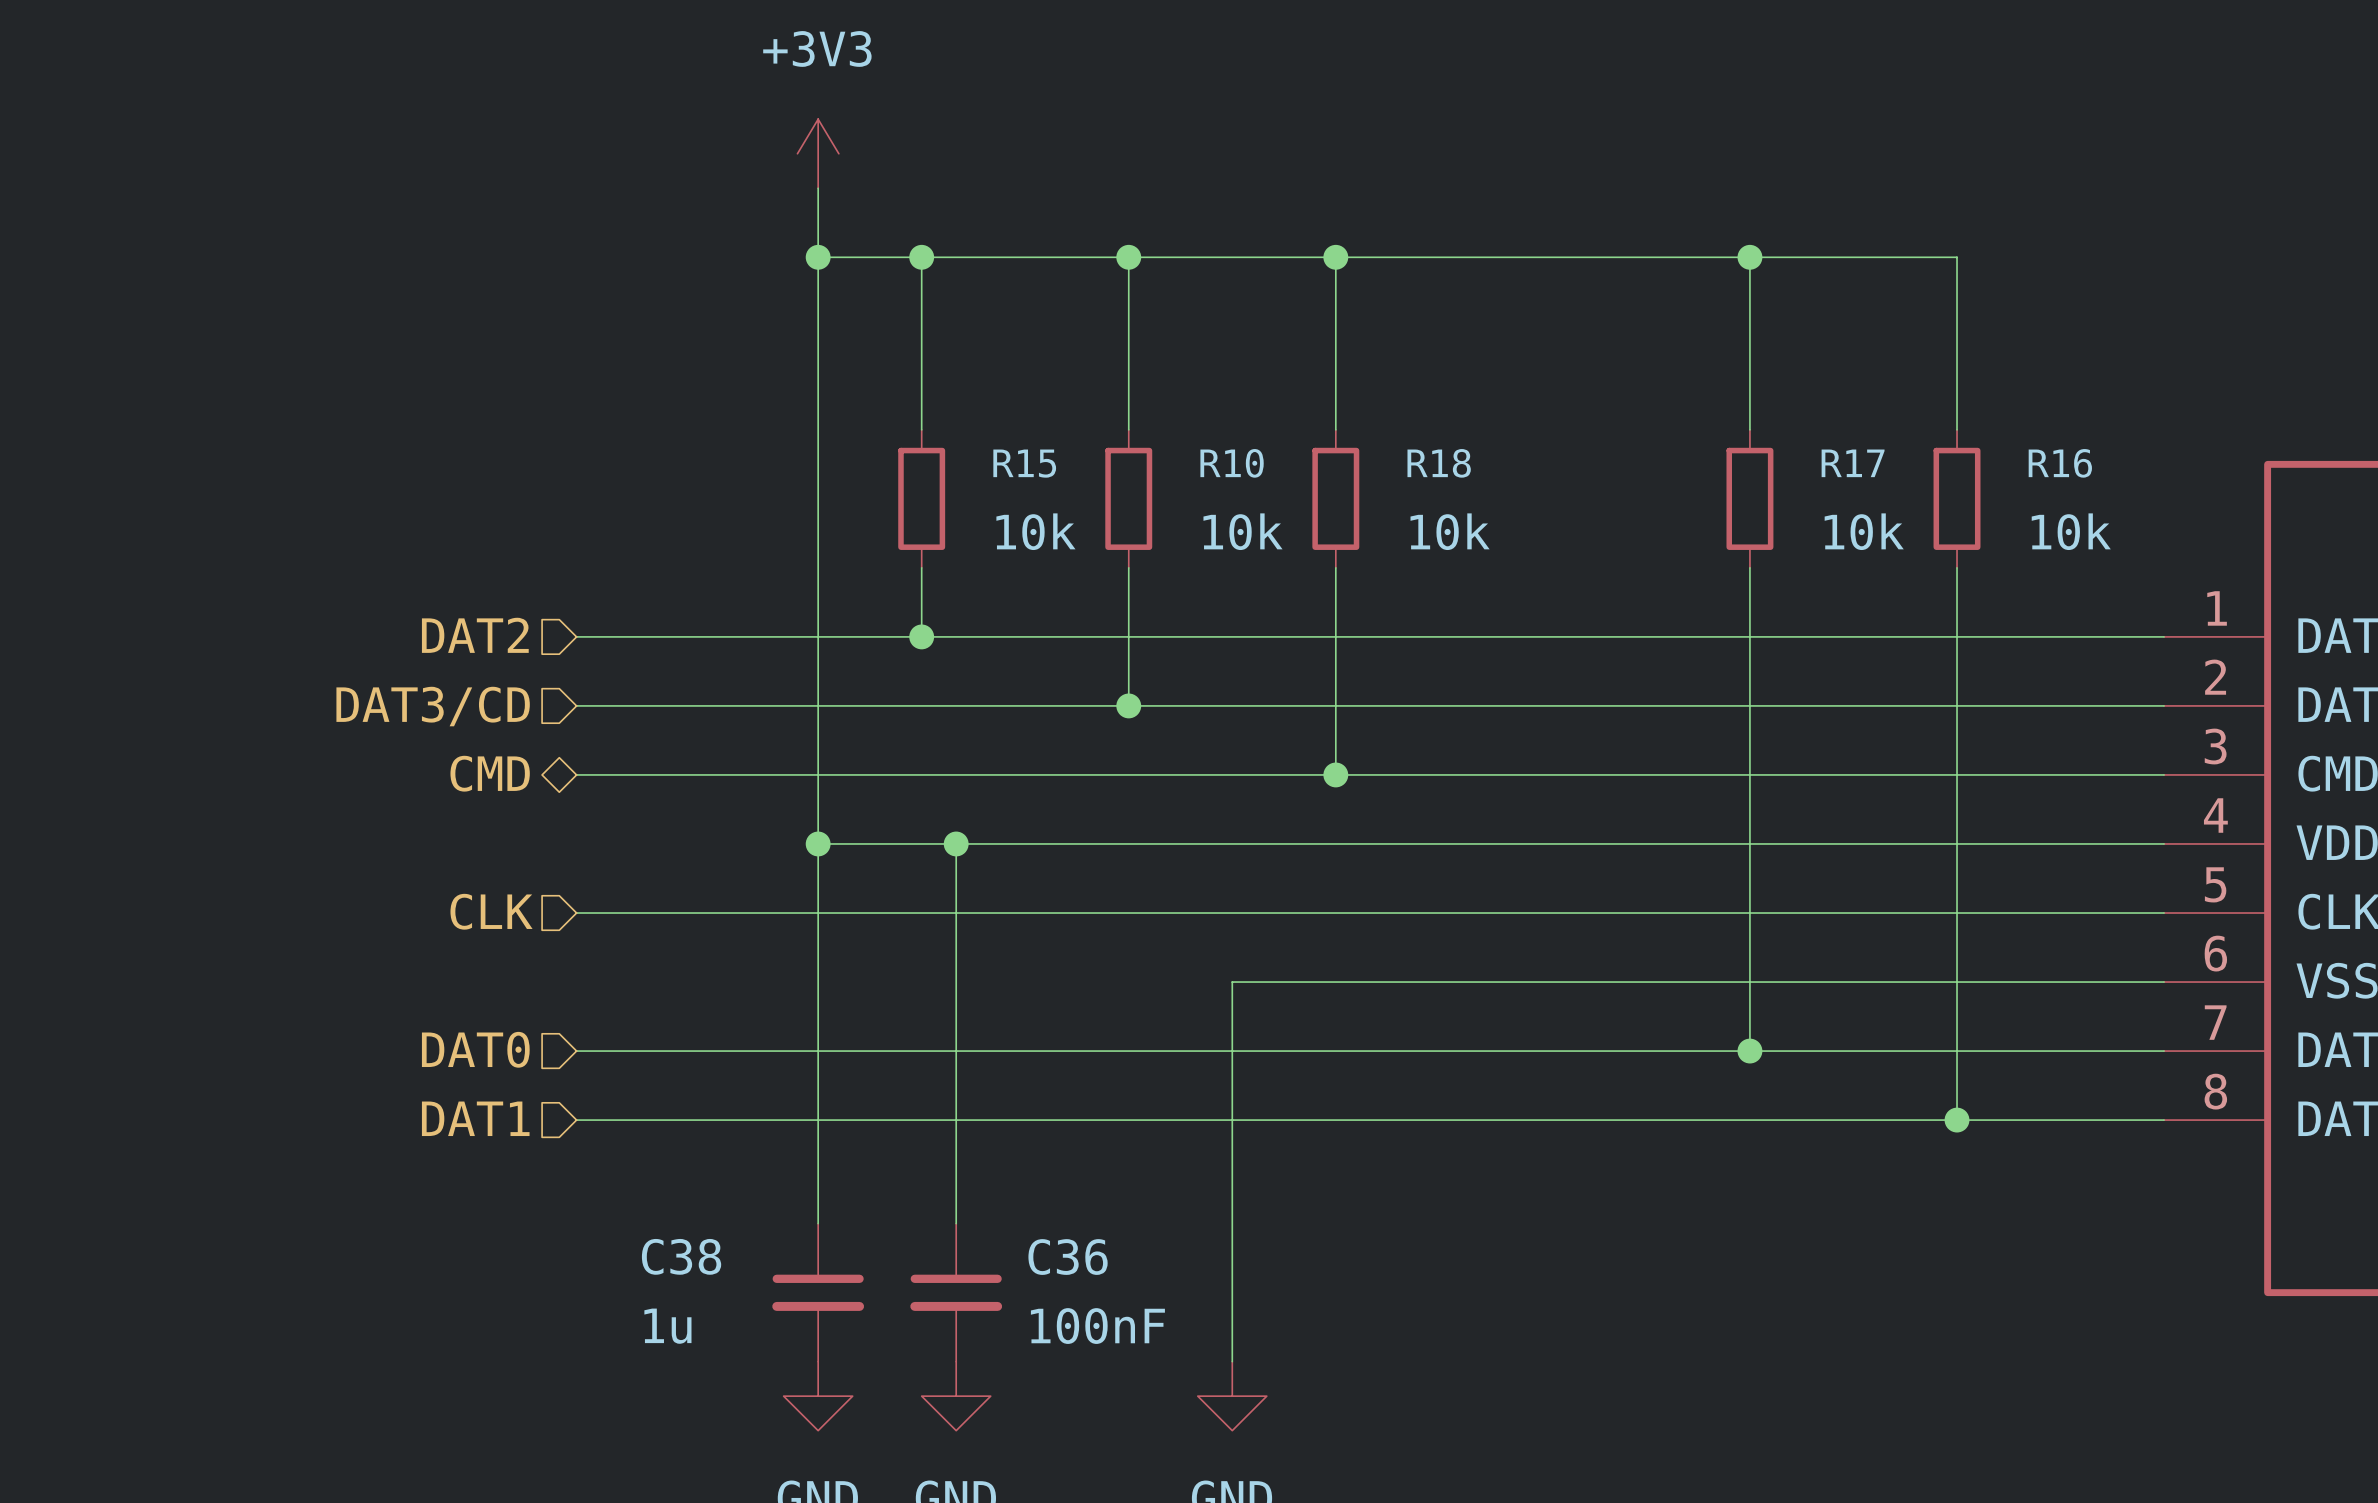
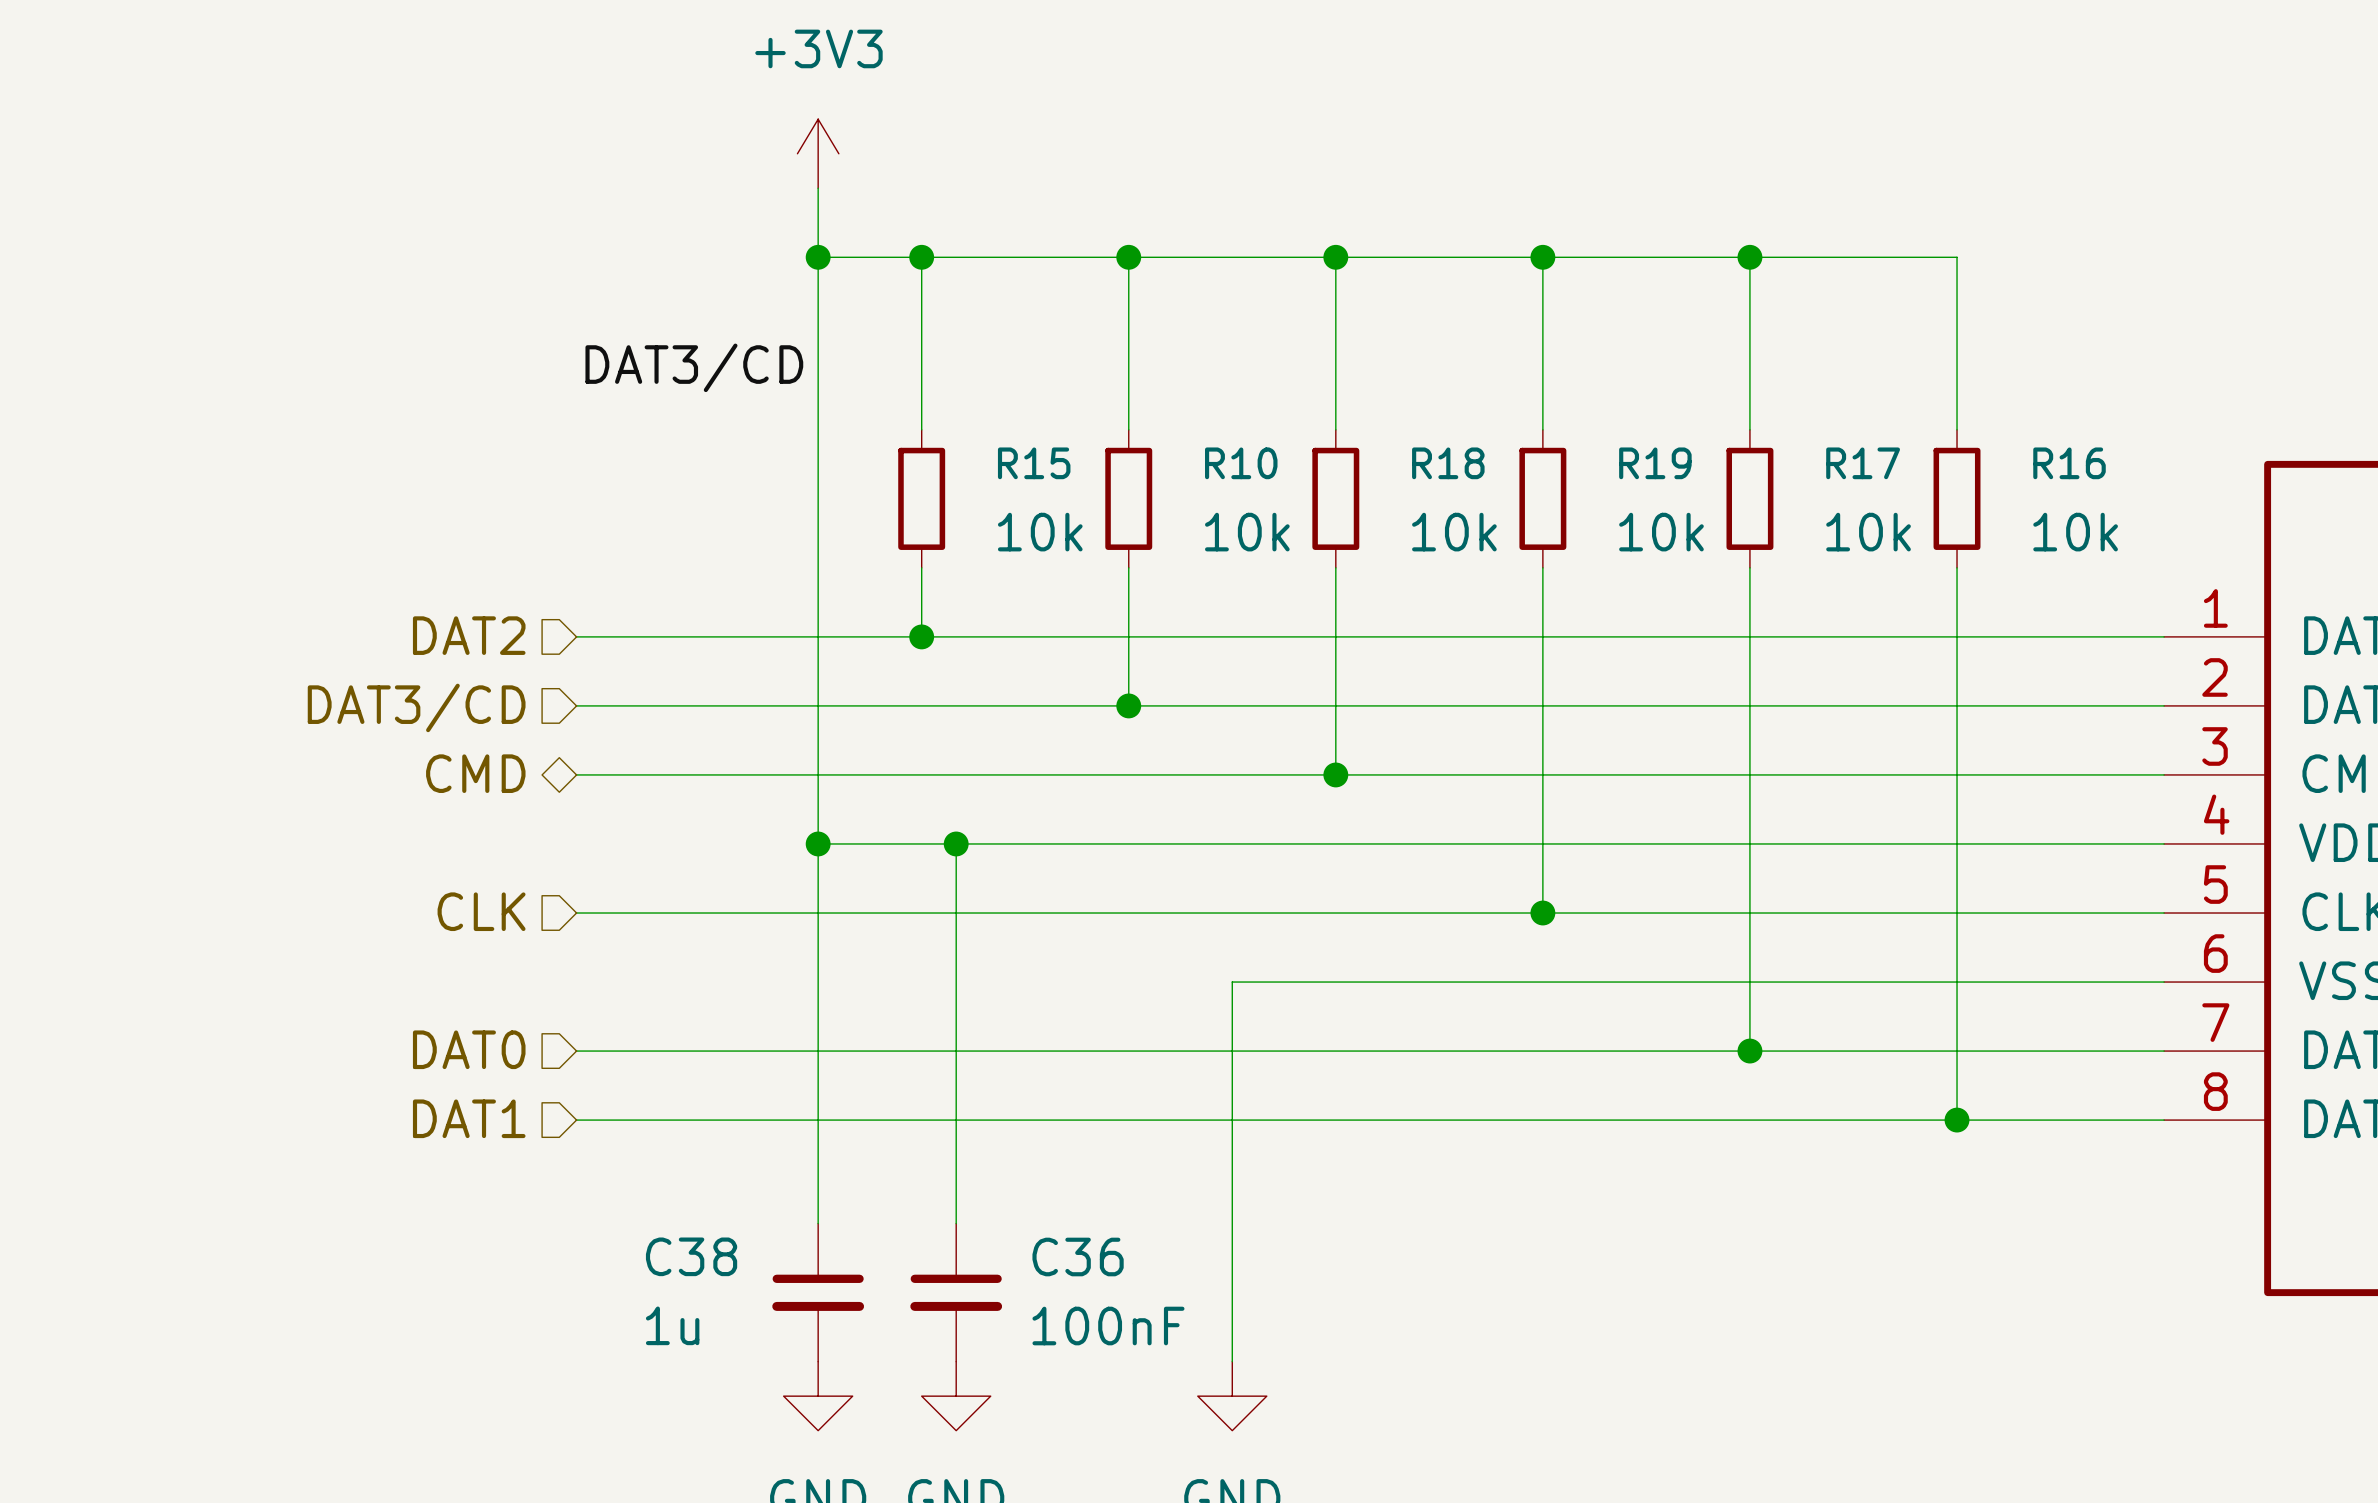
wire: none -> (1542, 257) (1542, 429)
junction: none -> (1542, 257)
label: none -> DAT3/CD (694, 367)
R19: none -> 10k (1542, 498)
wire: none -> (1542, 567) (1542, 913)
junction: none -> (1542, 913)

